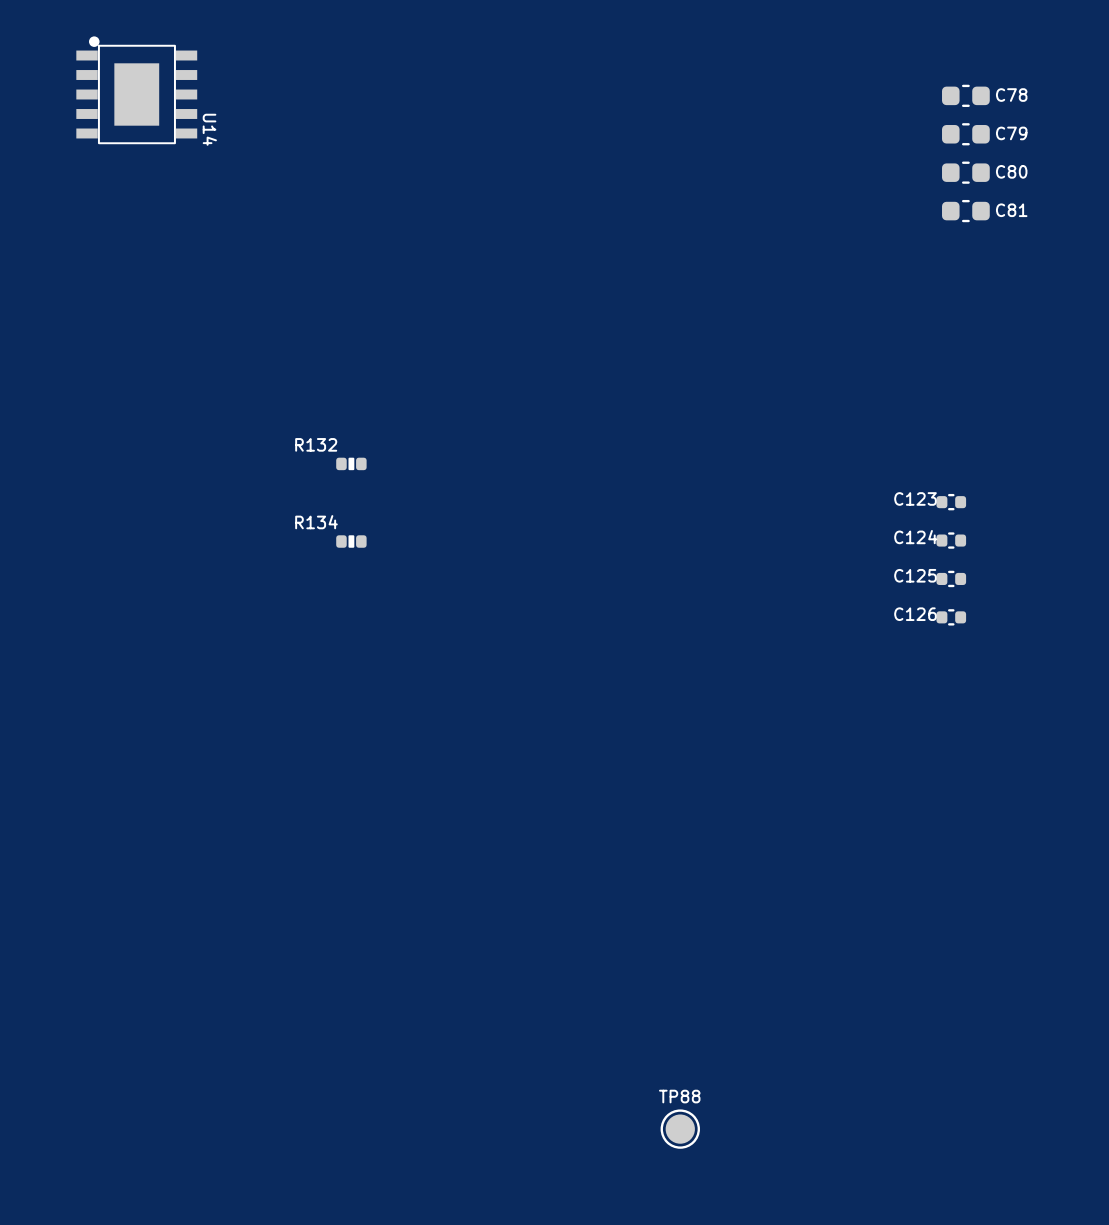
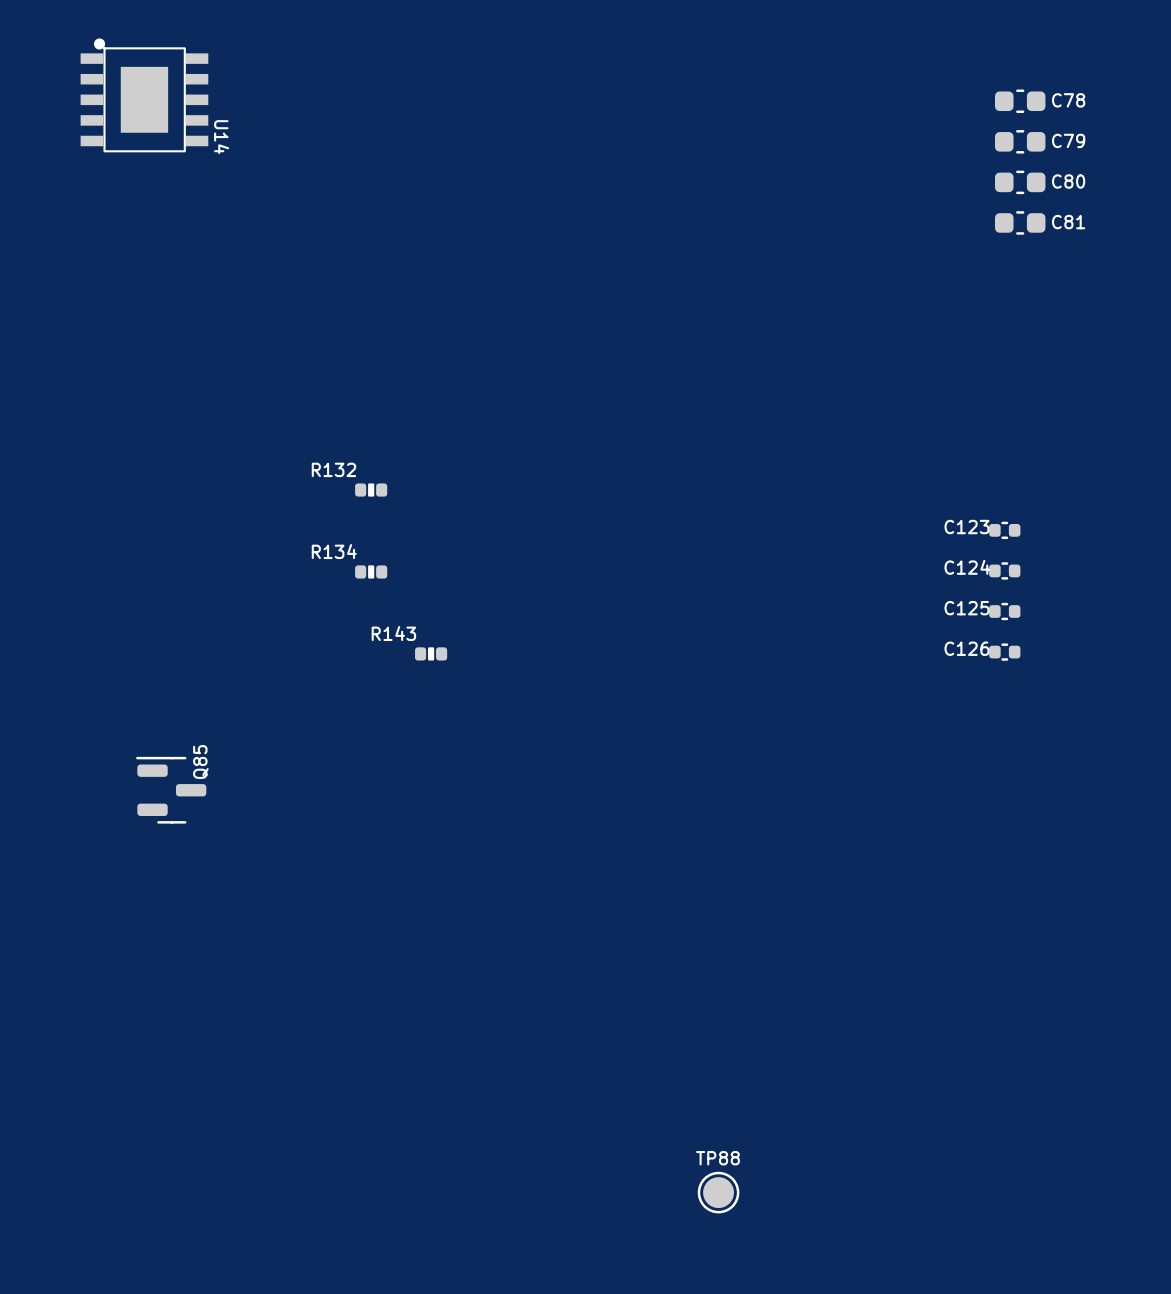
R143: none -> (431, 653)
Q85: none -> (171, 790)

